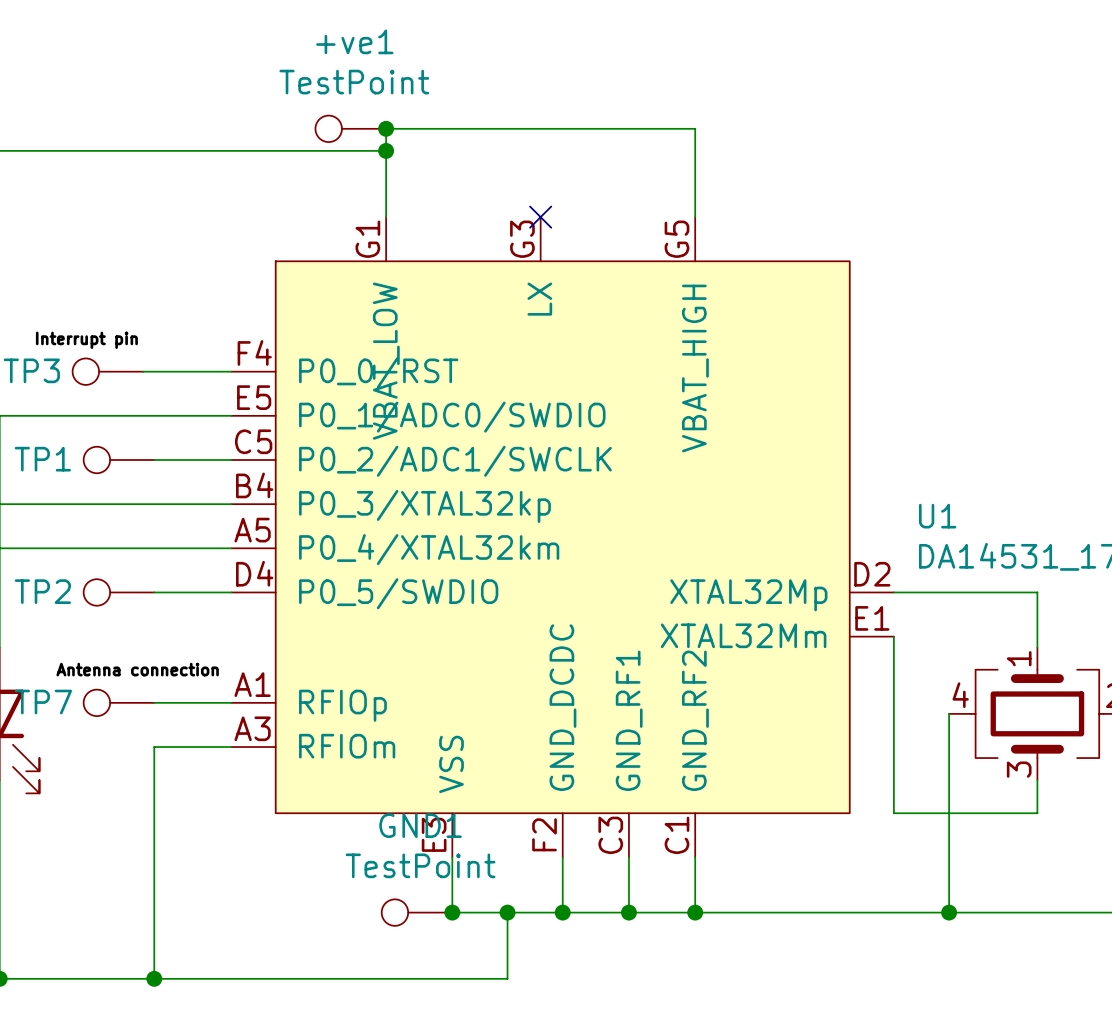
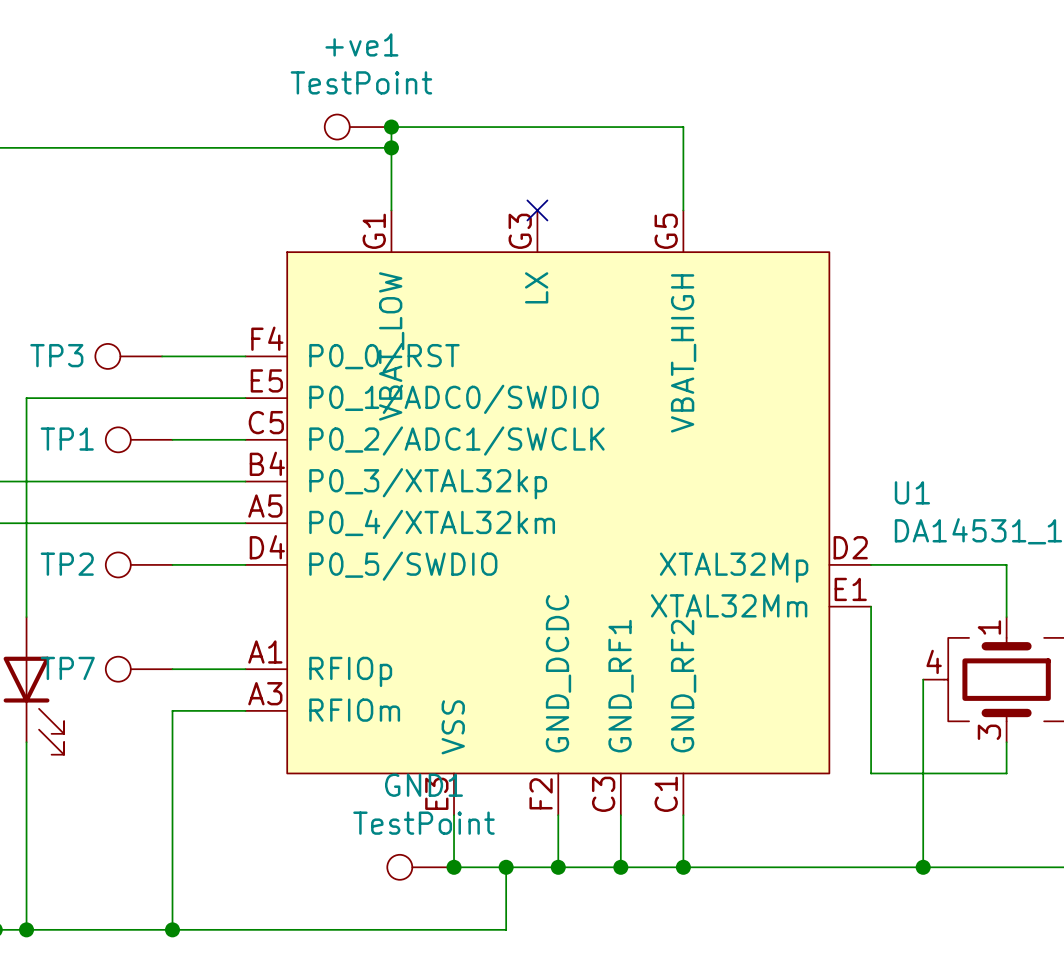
label: Interrupt pin (86, 340) -> none
label: Antenna connection (137, 669) -> none

